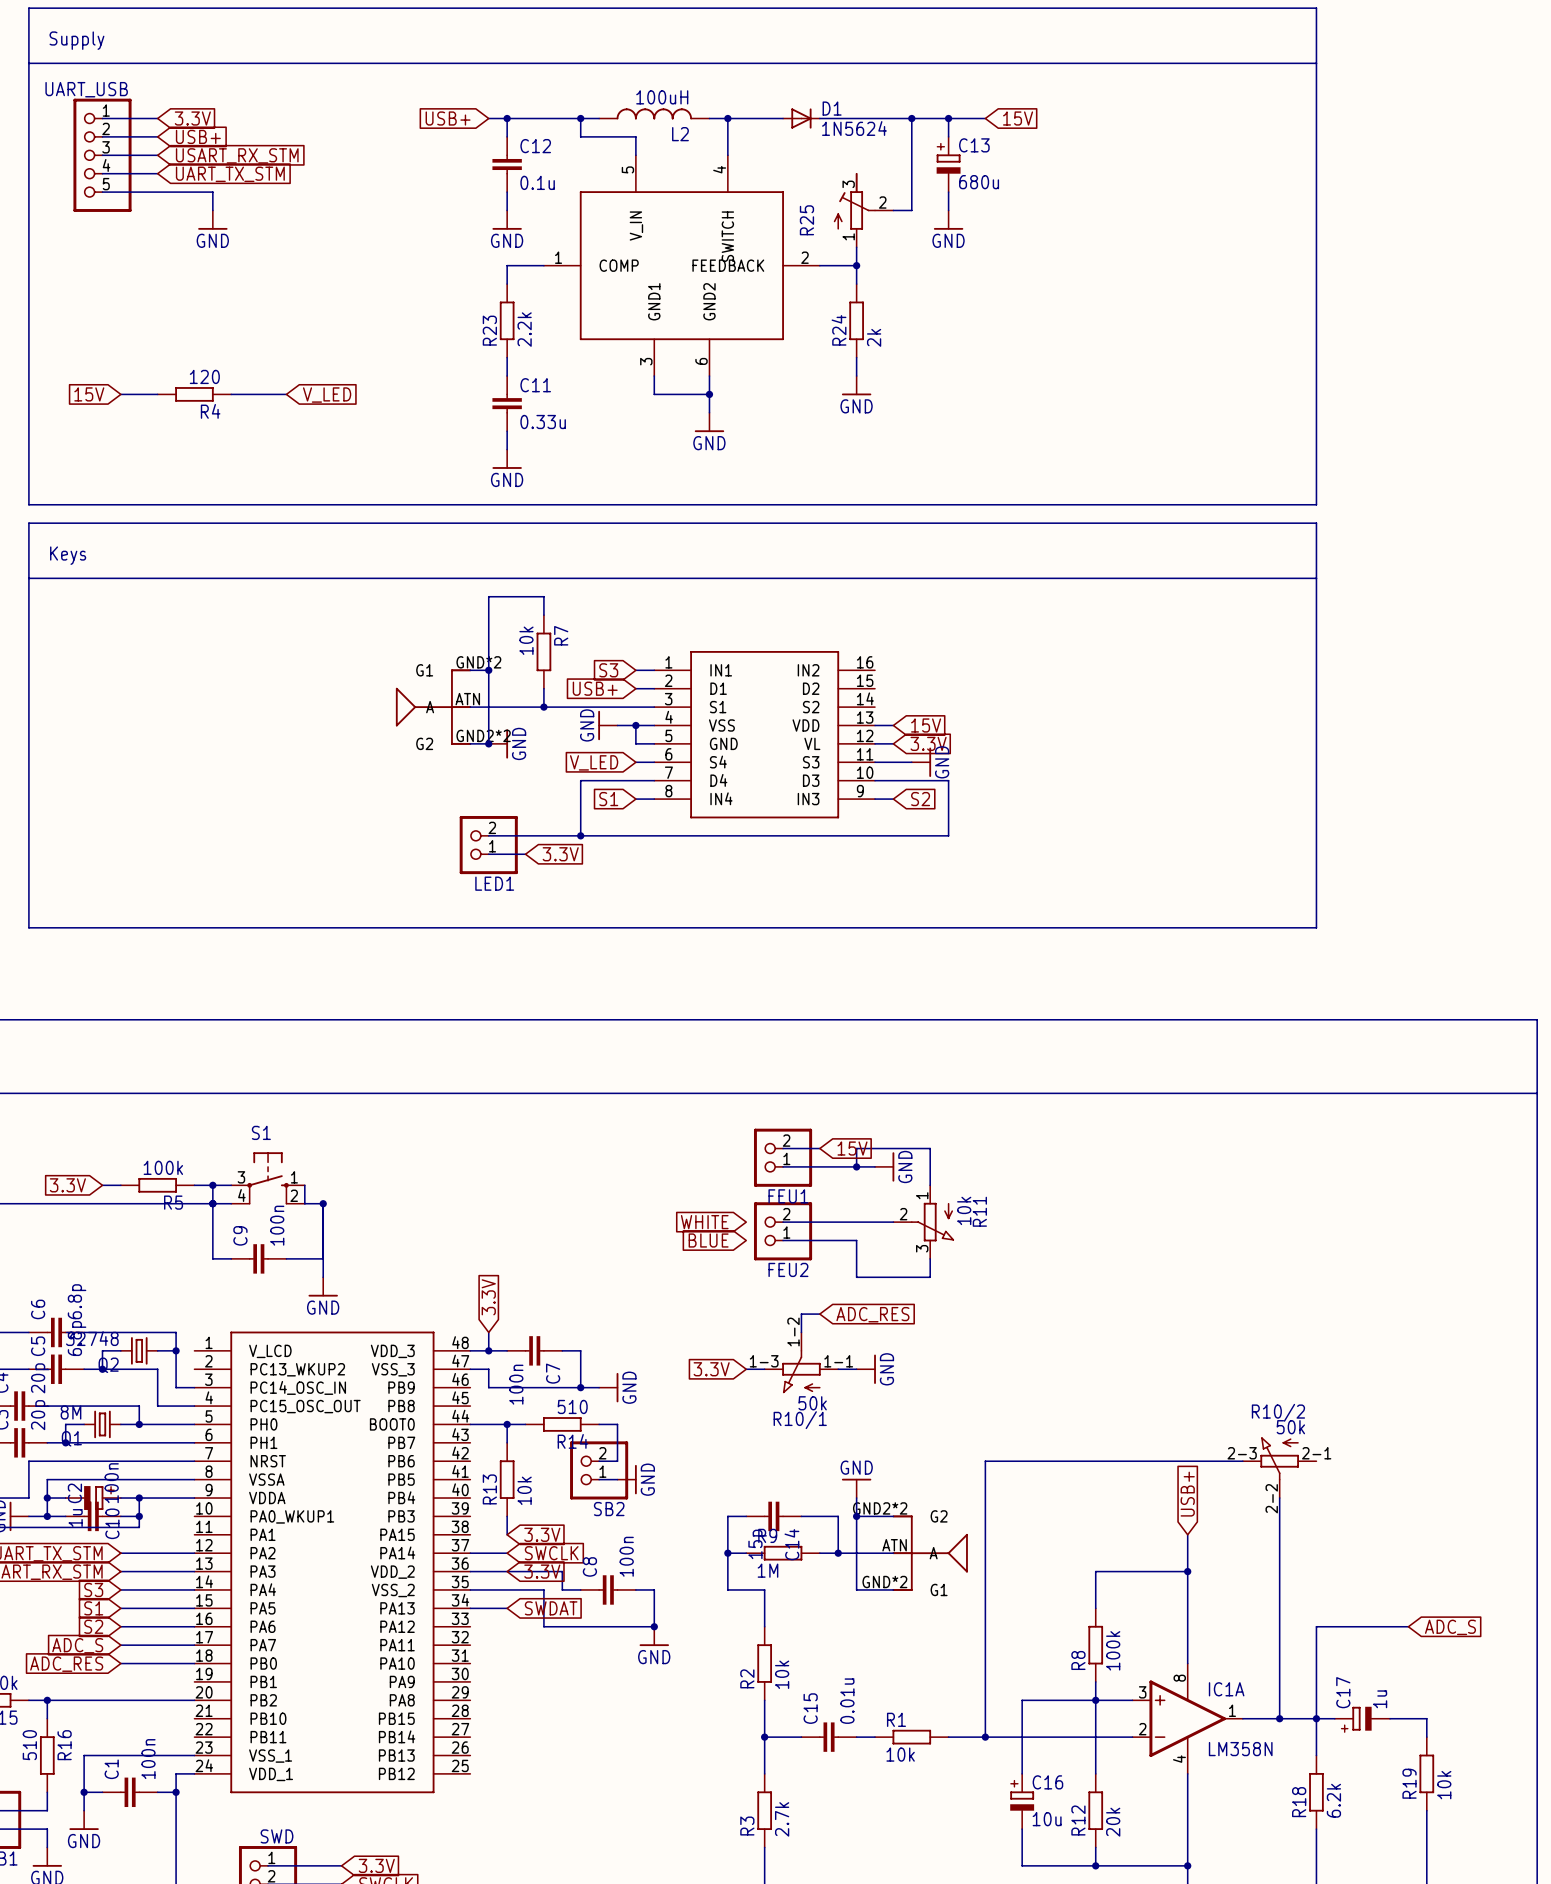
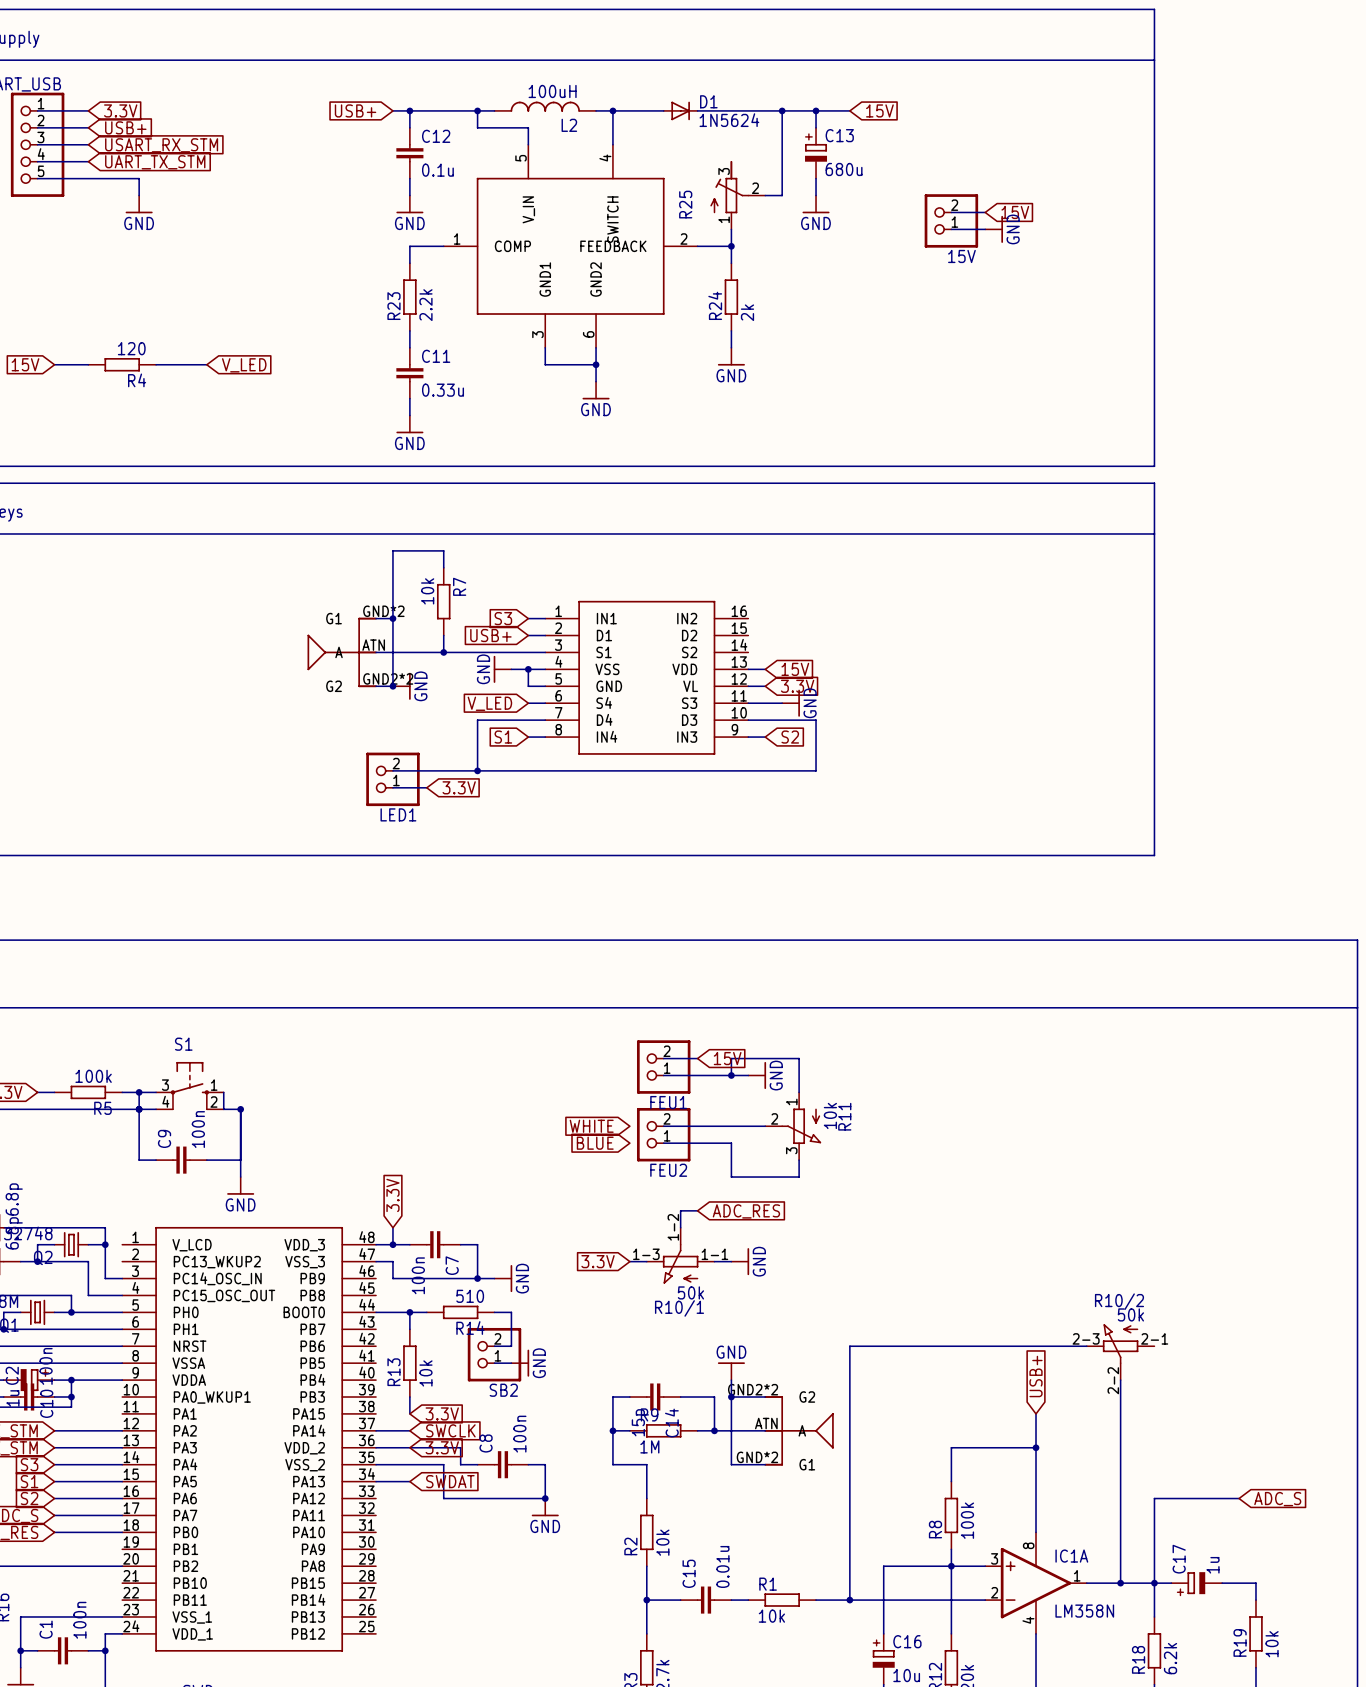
wire: none -> (951, 212) (985, 212)
global label: none -> 15V (1015, 212)
15V: none -> (951, 220)
wire: none -> (951, 229) (985, 229)
power symbol: none -> GND (994, 229)

